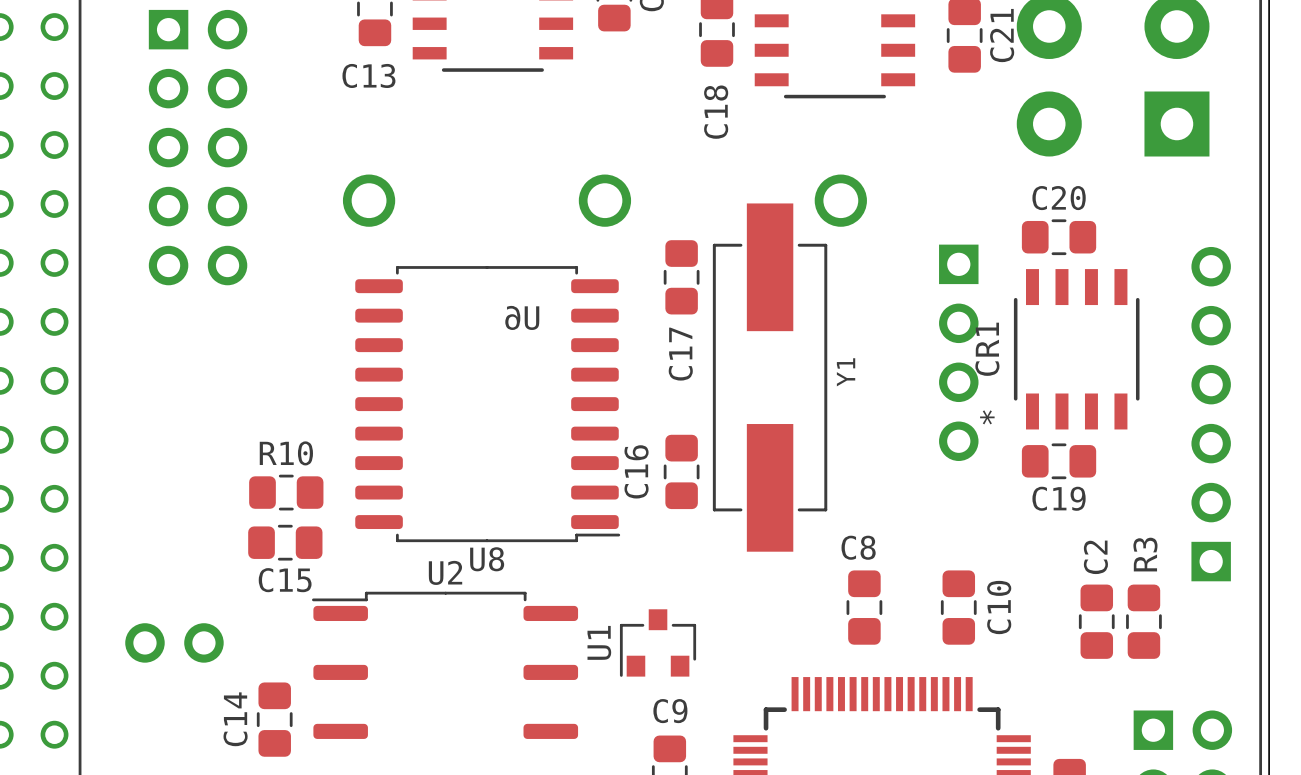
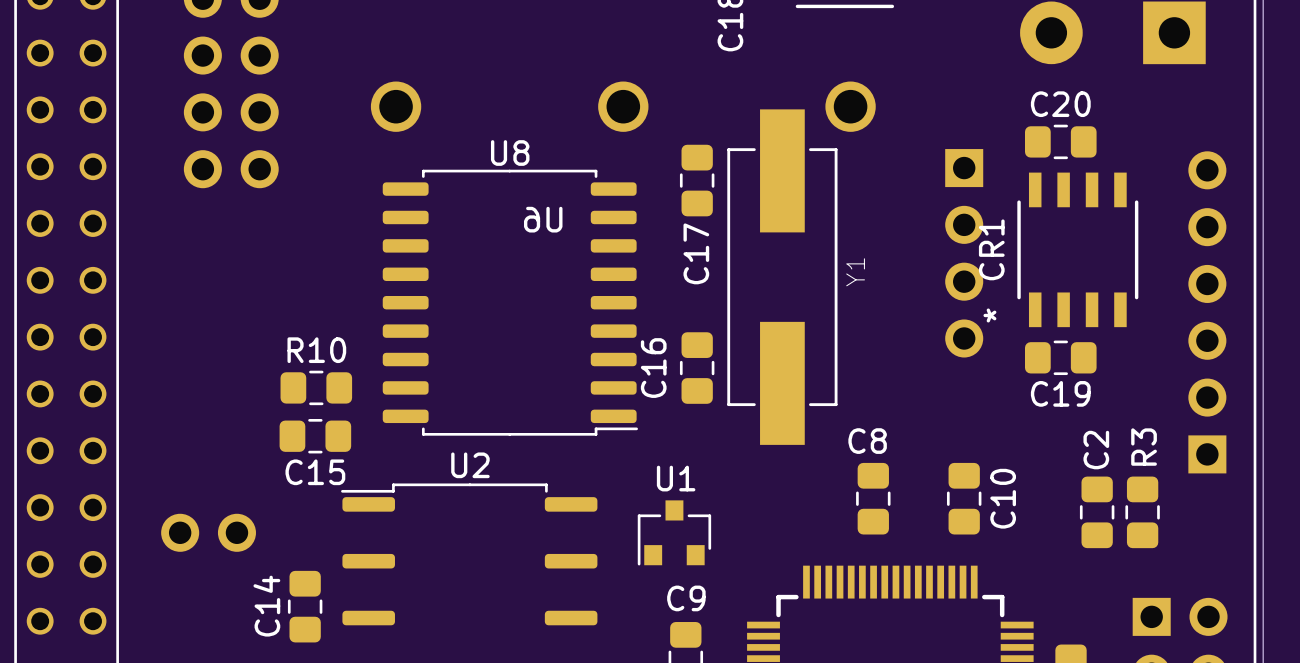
U8 name position: U8 (487, 559) -> U8 (510, 153)
U1 name rotation: 0° (599, 642) -> 90° clockwise (676, 478)
U1 name position: U1 (599, 642) -> U1 (676, 478)

